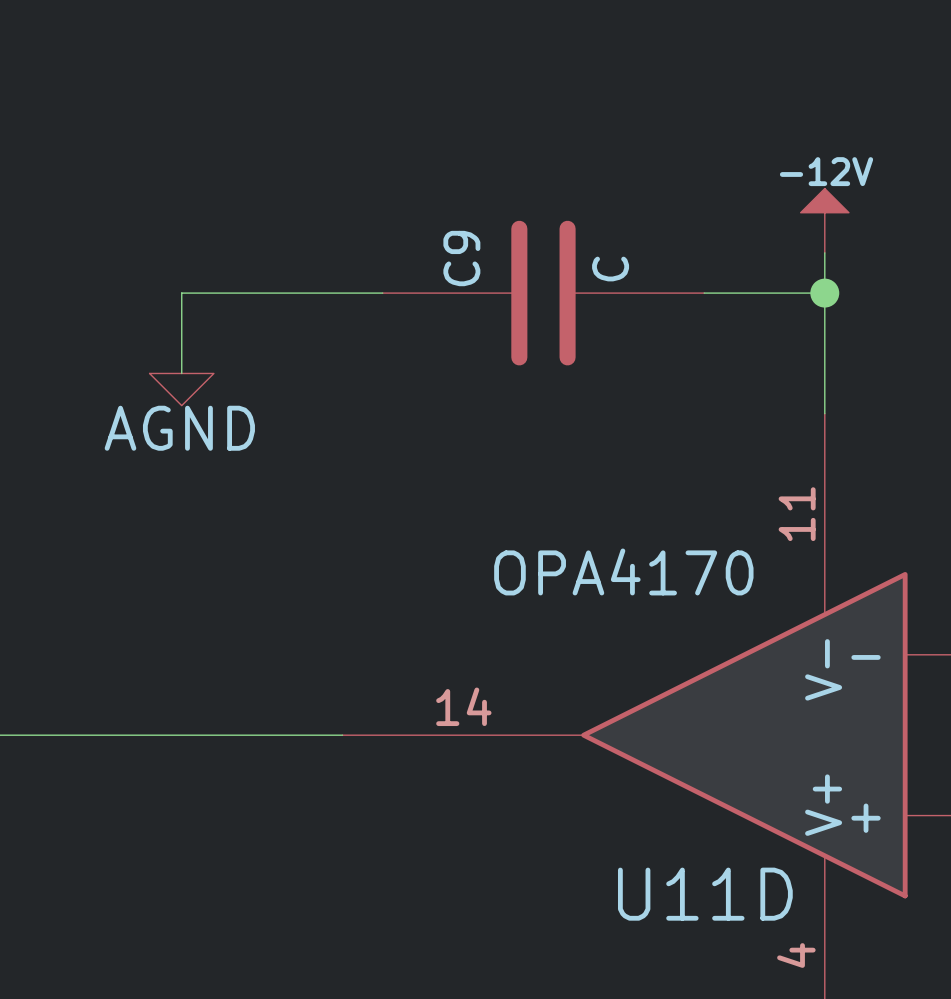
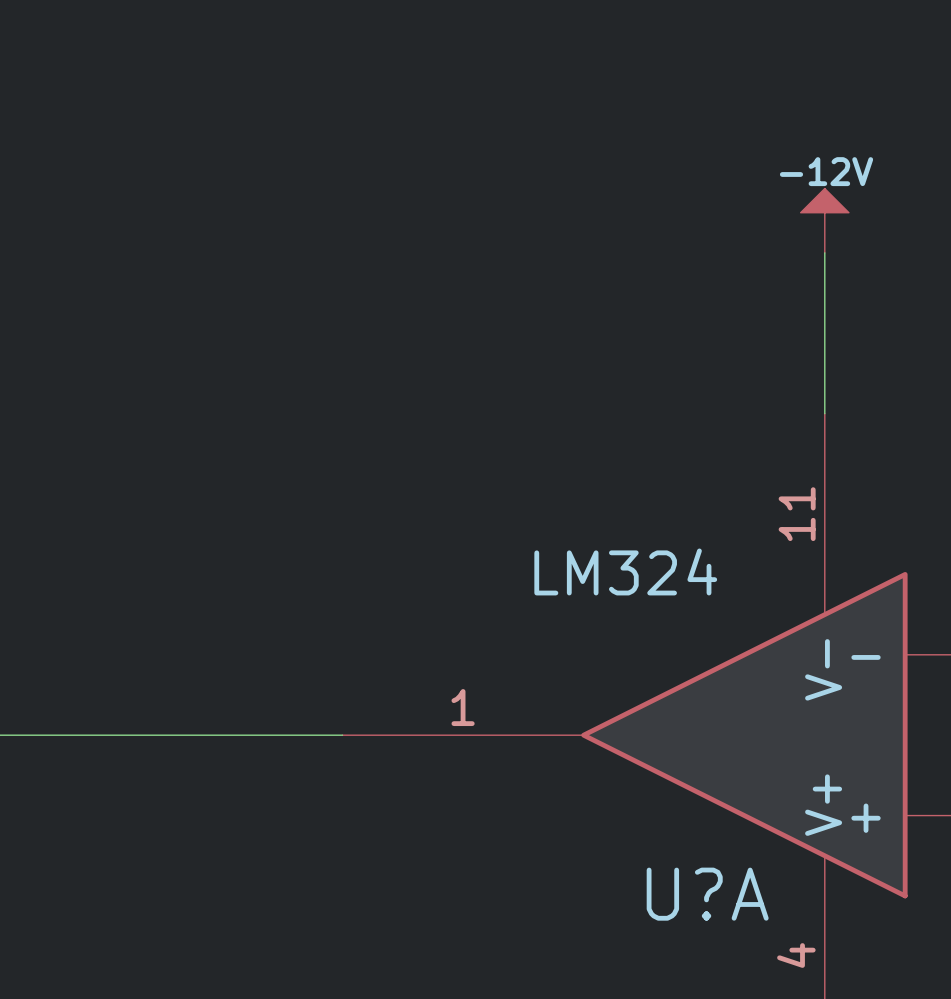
wire: (382, 293) (181, 293) (181, 373) -> none
C9: C (543, 293) -> none
wire: (704, 293) (824, 293) -> none
junction: (824, 293) -> none
power symbol: AGND (181, 389) -> none
U11D value: OPA4170 (623, 571) -> LM324 (625, 571)
U11D pin number: 14 (463, 706) -> 1 (463, 707)
U11D name: U11D (705, 894) -> U?A (707, 894)

